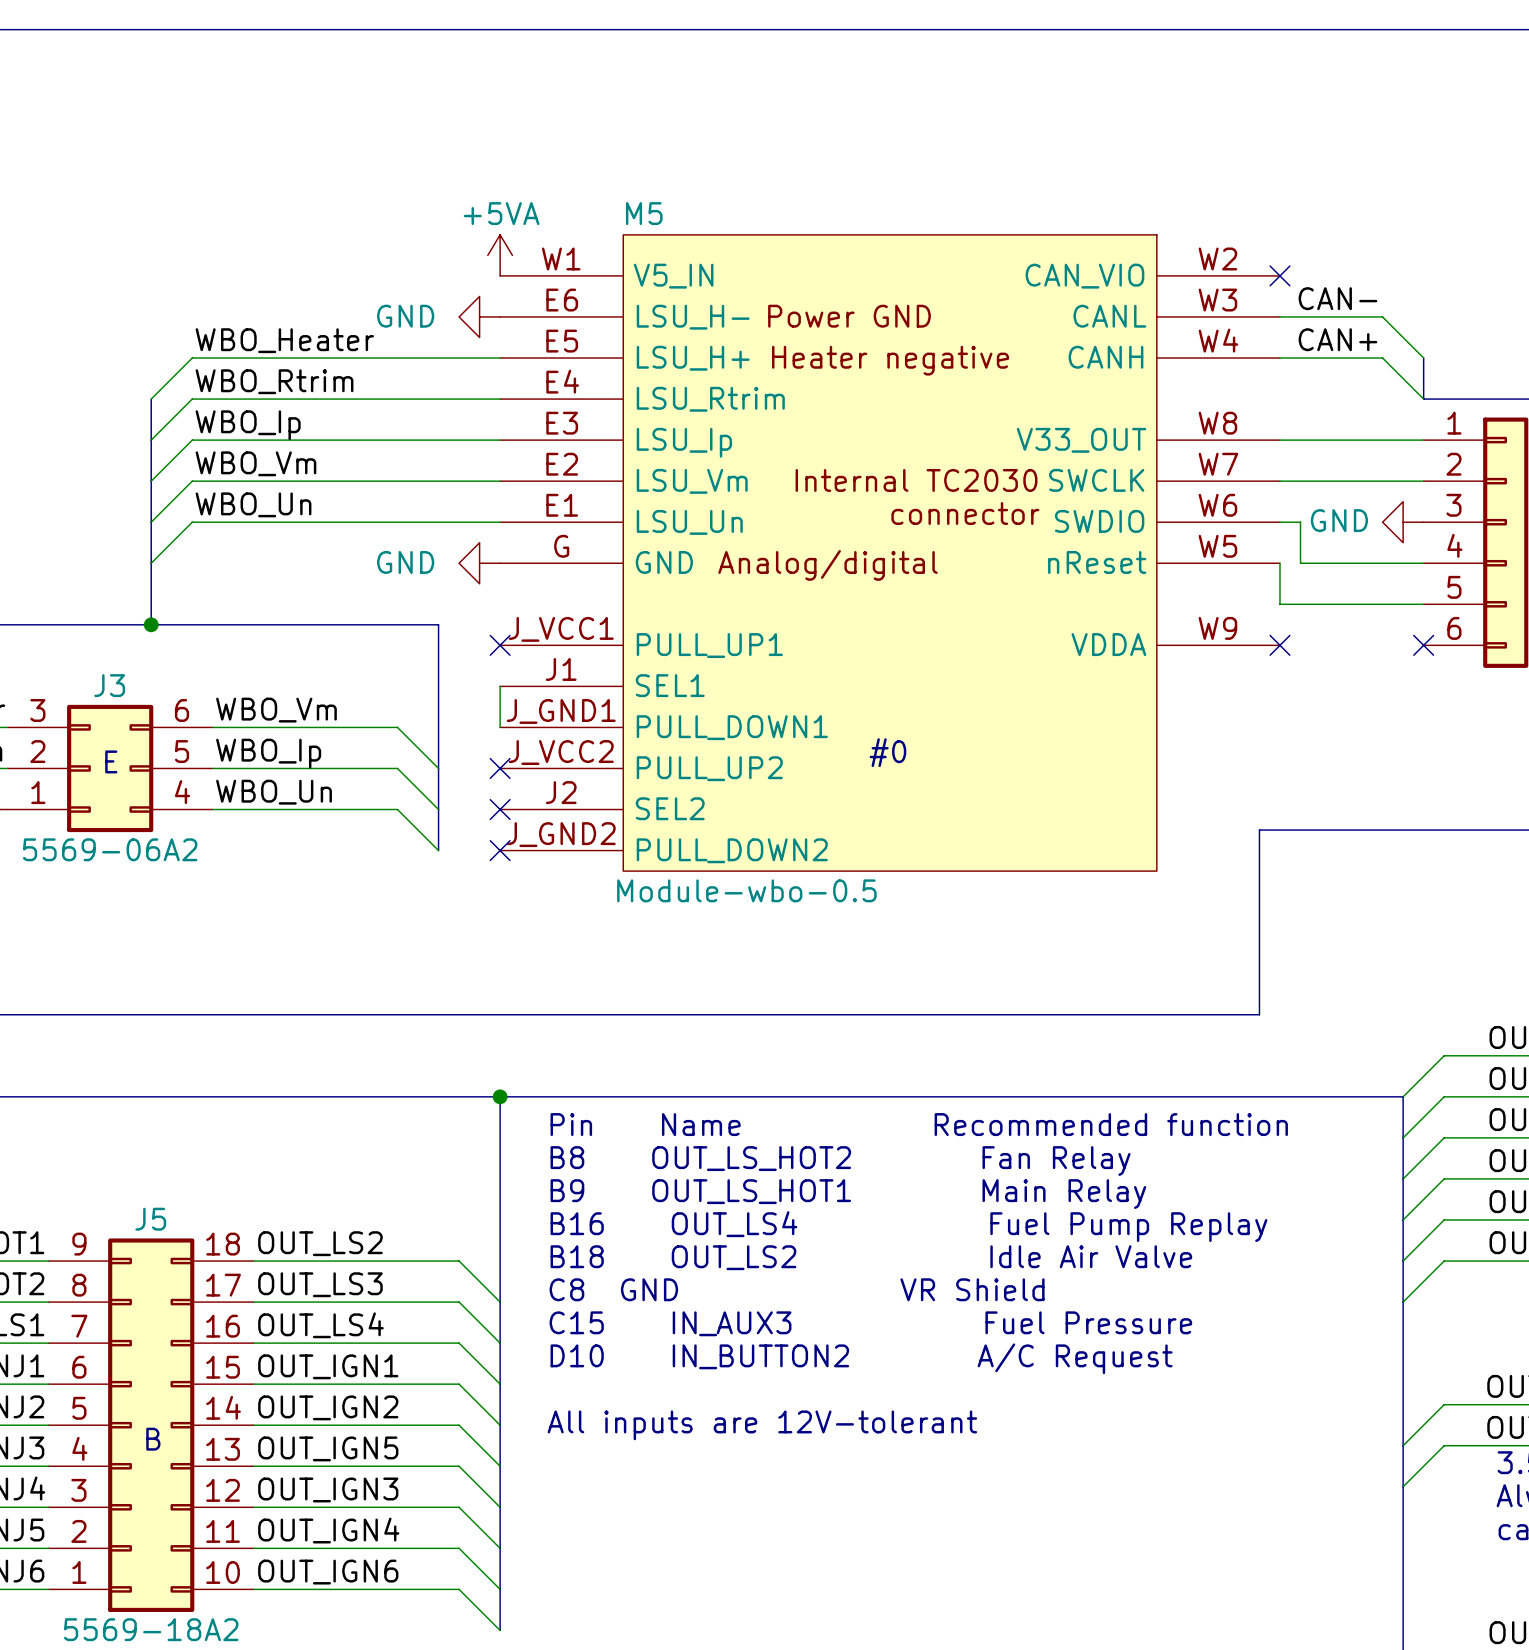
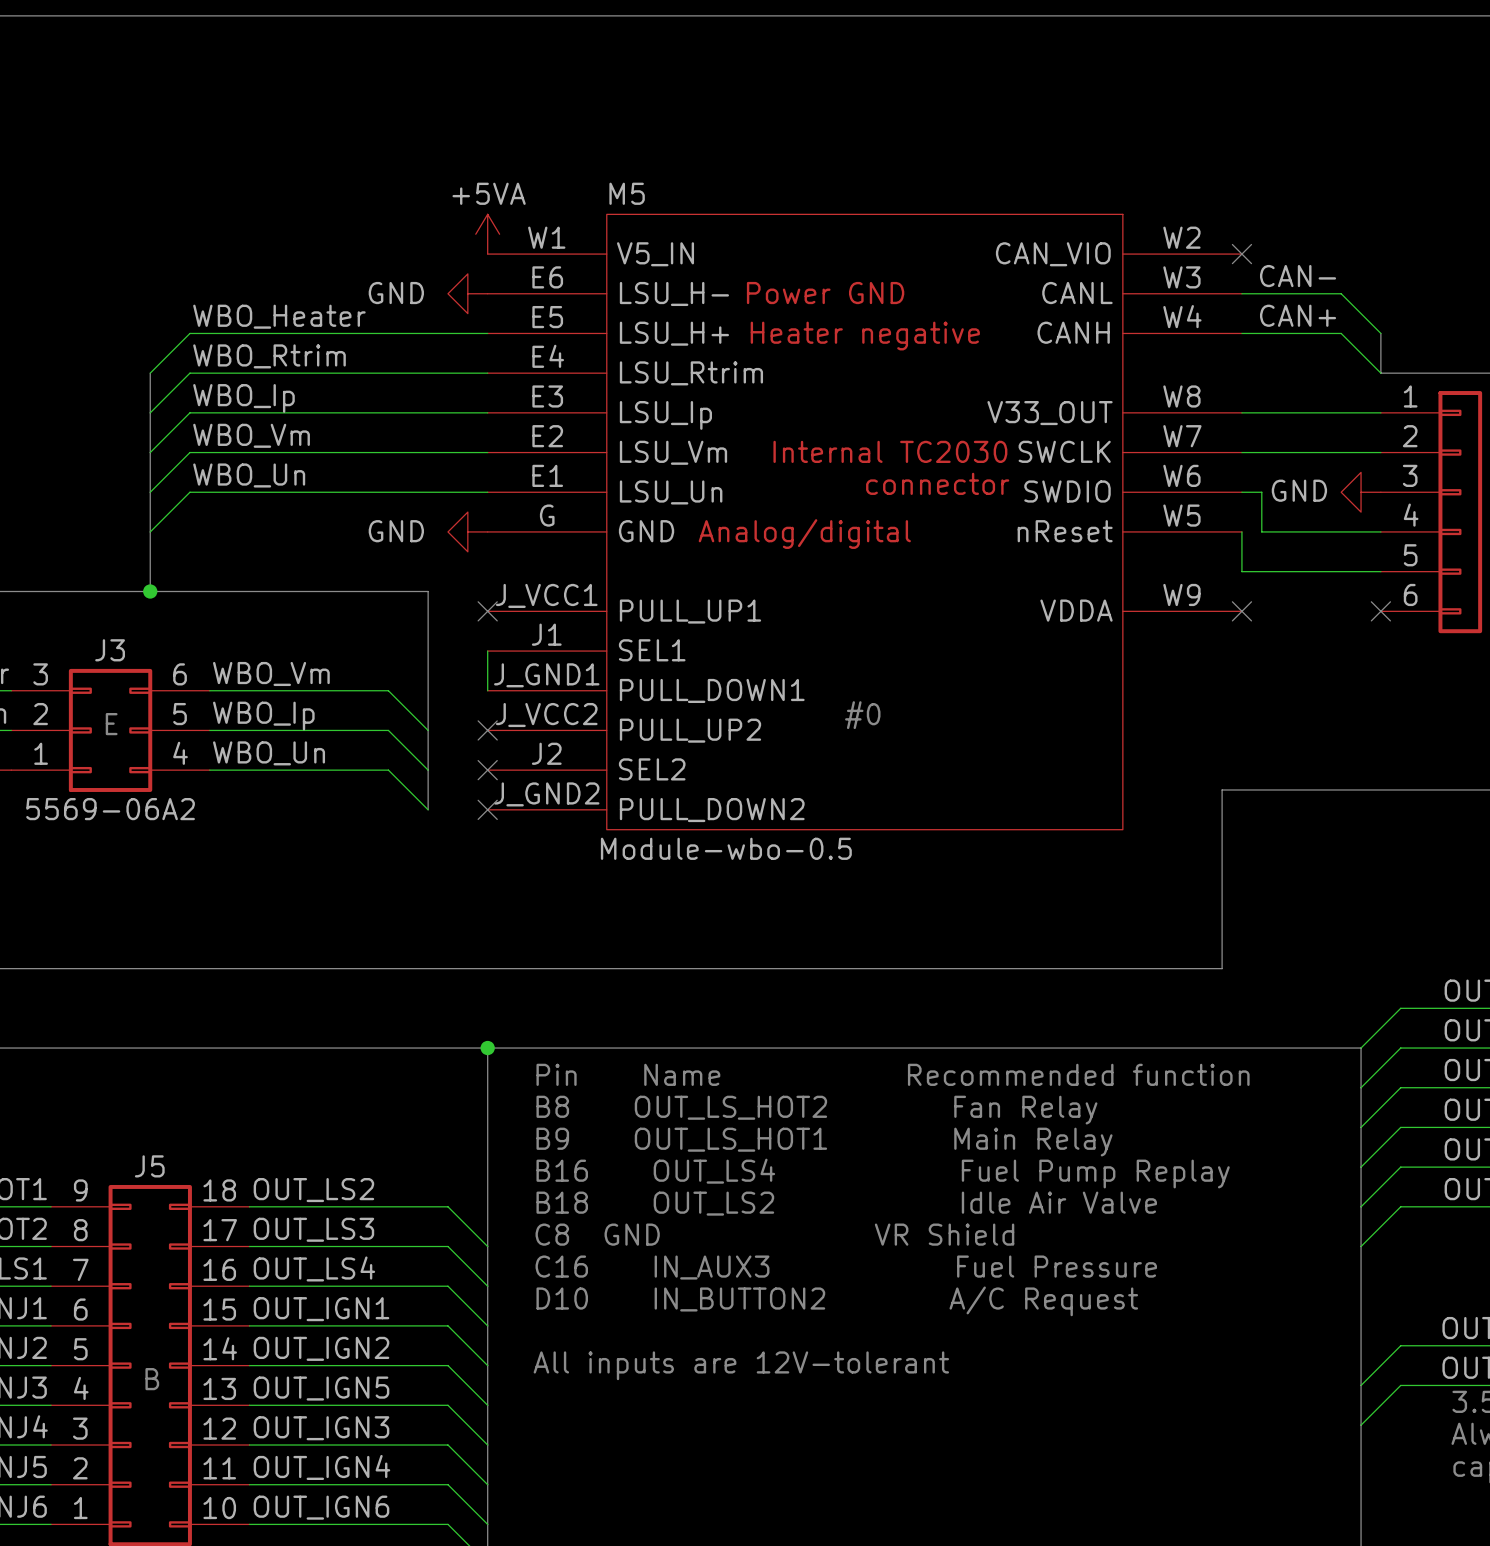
text: C15 IN_AUX3 Fuel Pressure (870, 1323) -> C16 IN_AUX3 Fuel Pressure (846, 1267)

